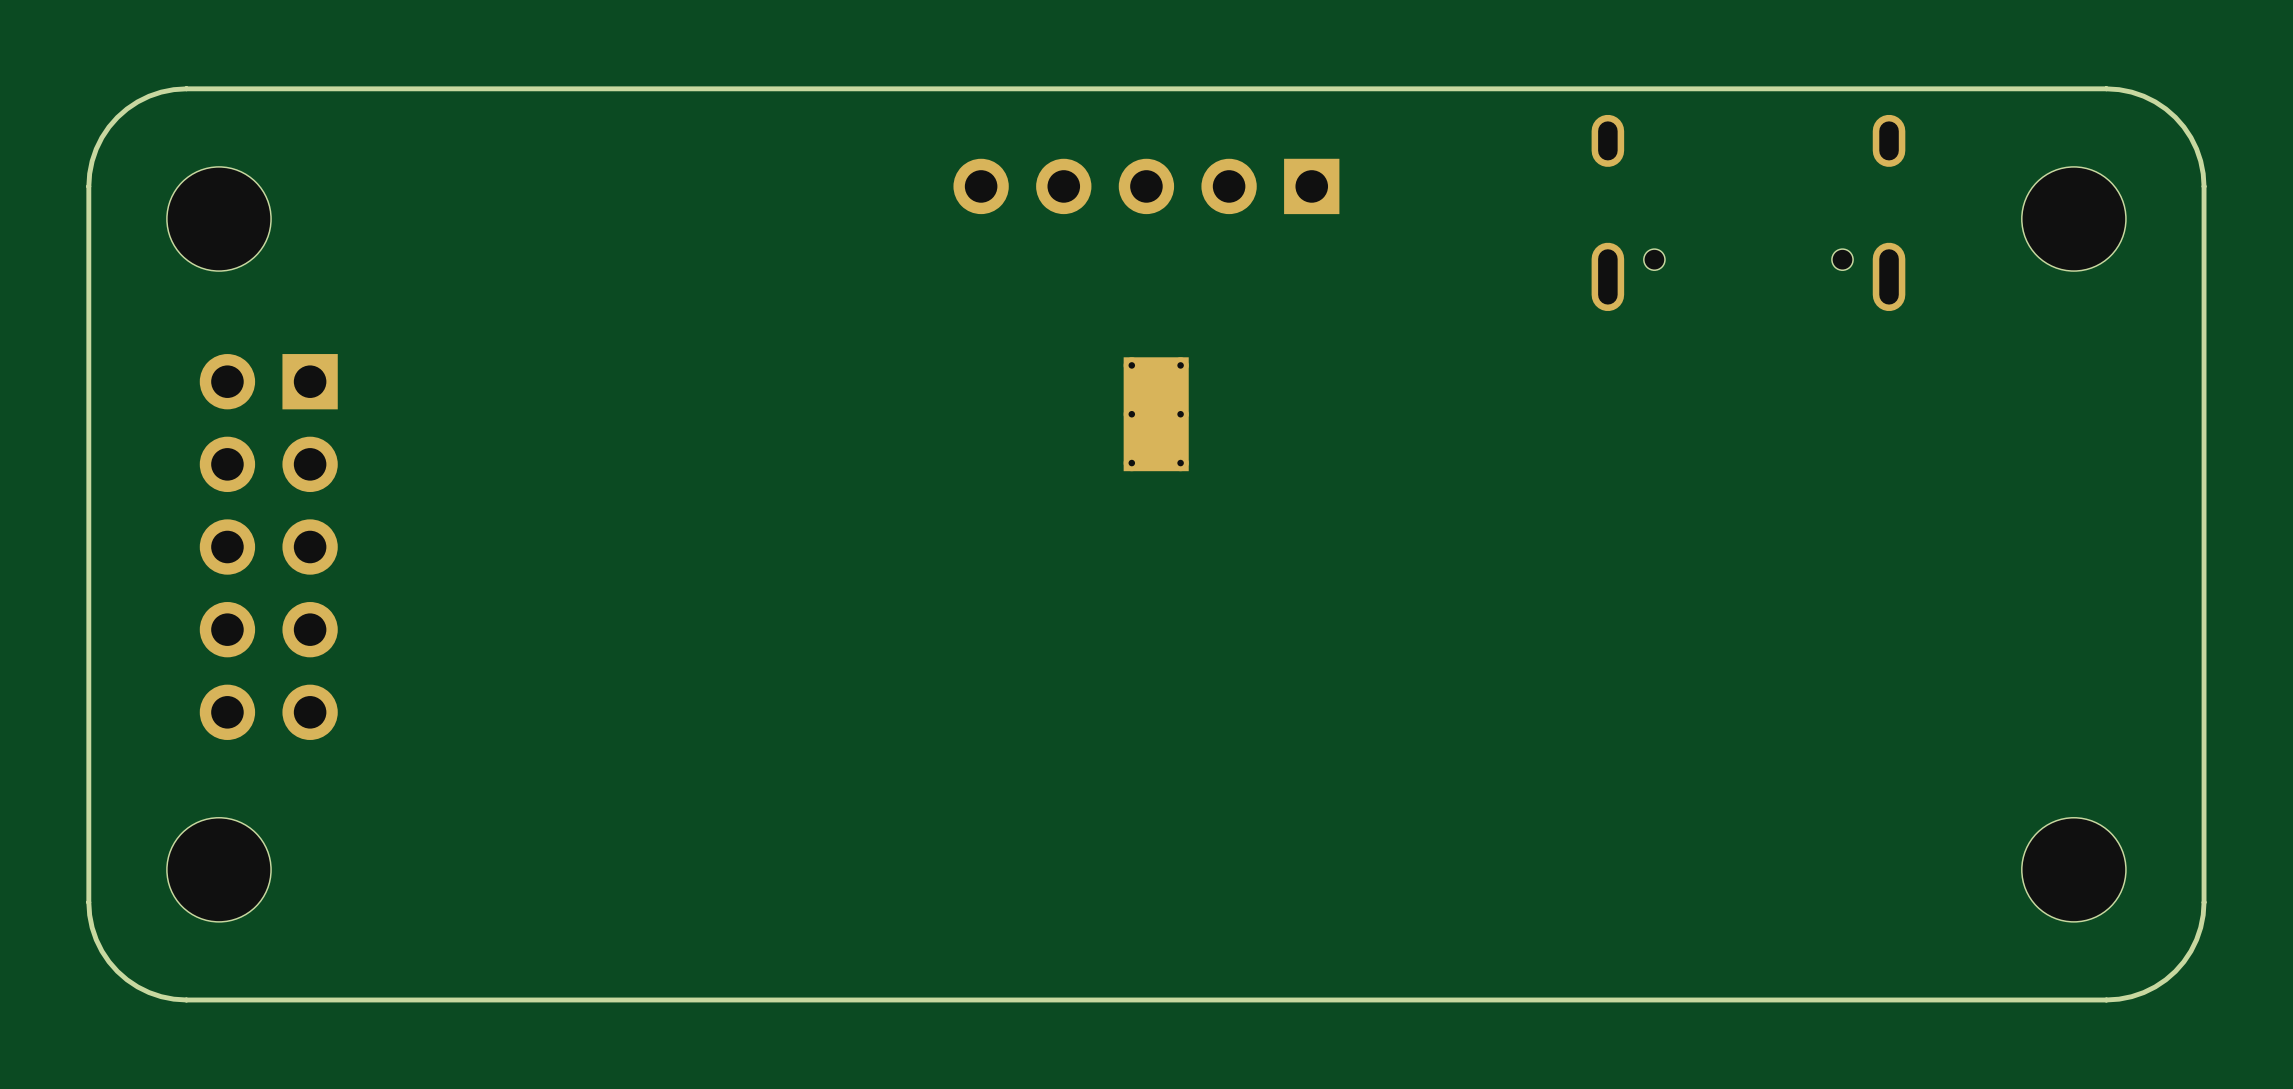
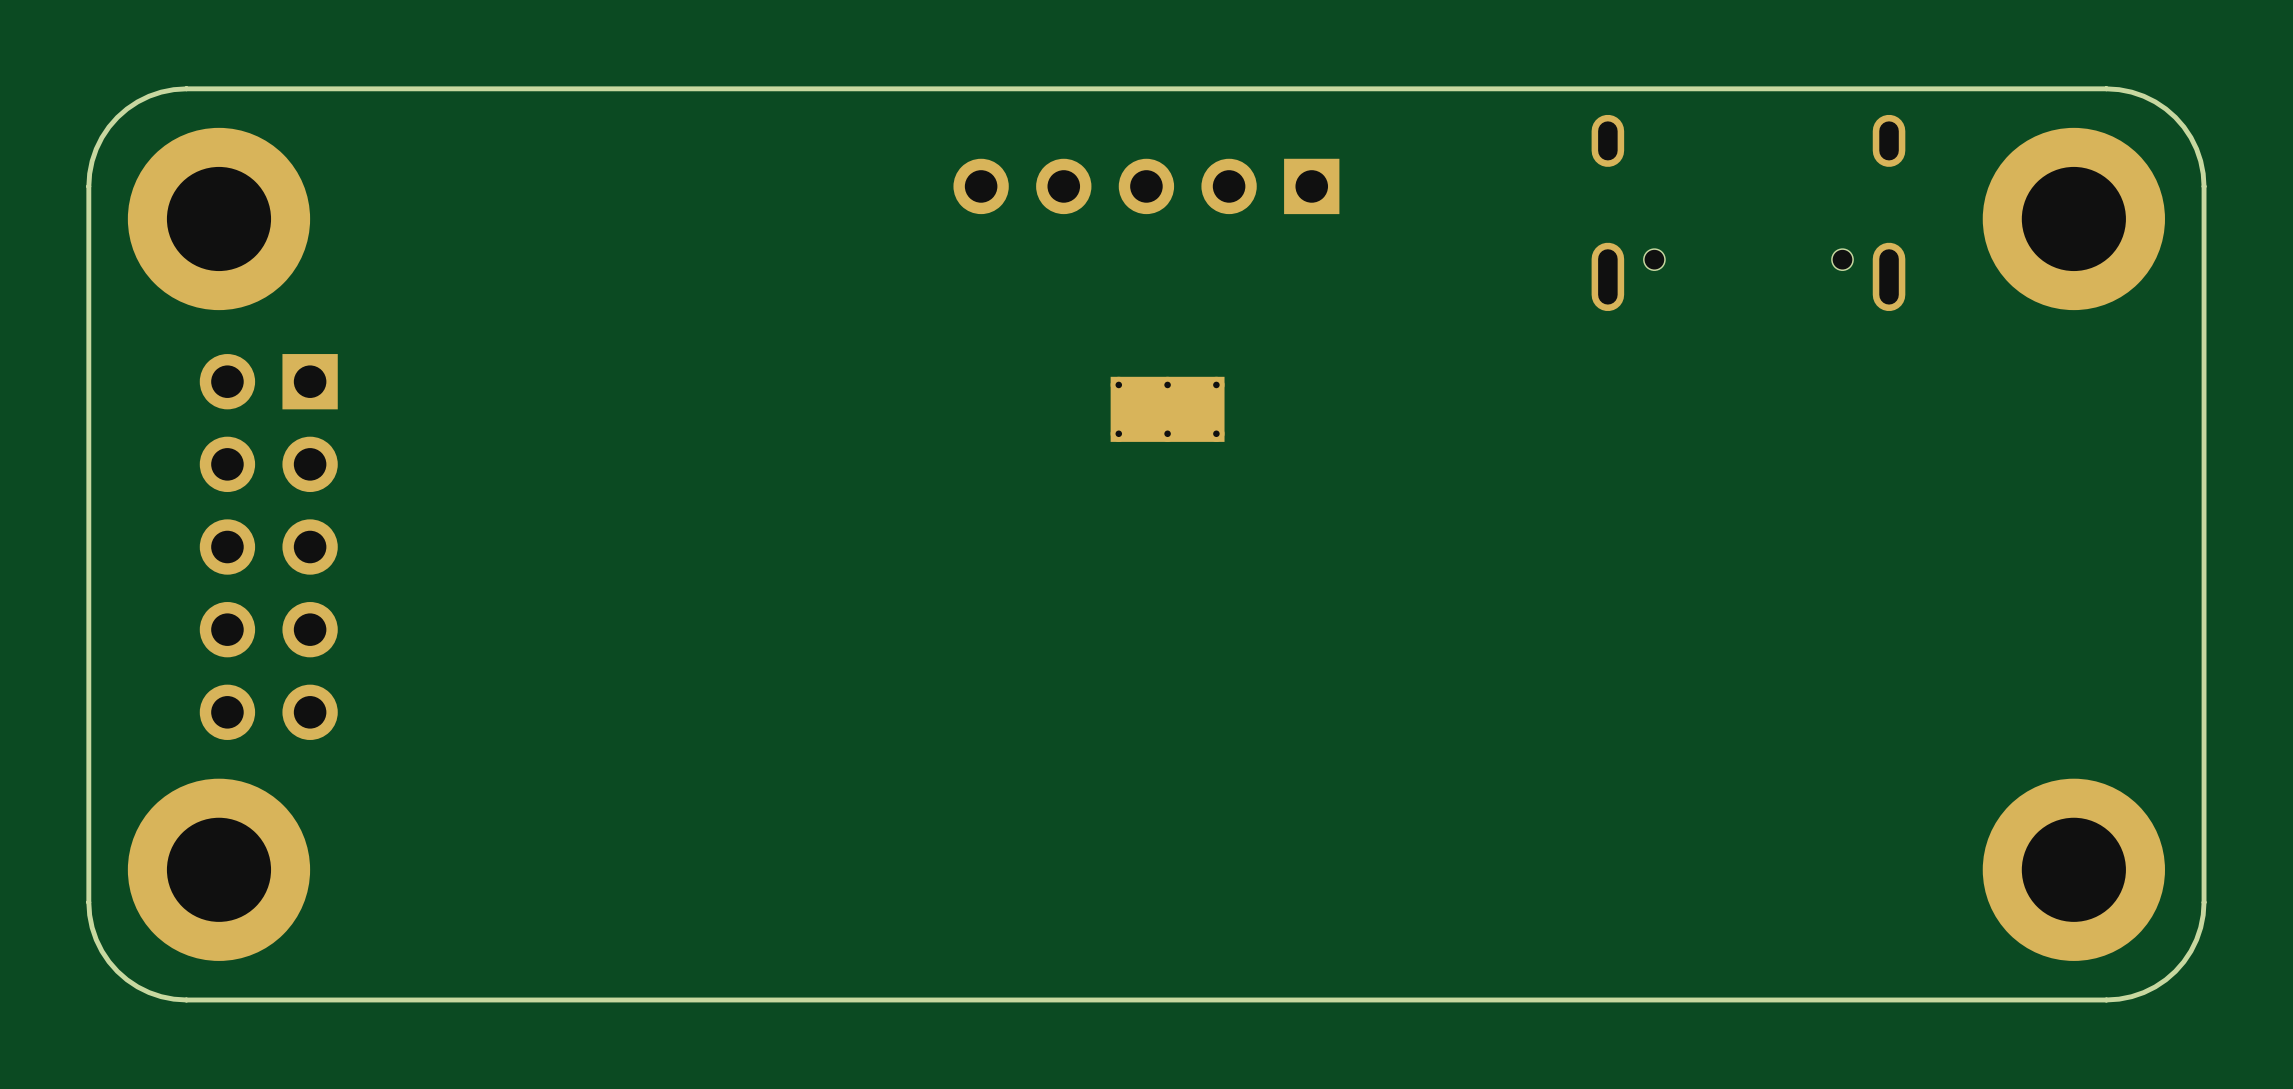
part footprint: [166, 166, 272, 272] -> [127, 127, 311, 311]
part footprint: [2021, 166, 2126, 272] -> [1982, 127, 2165, 311]
part rotation: 0° (1156, 414) -> 90° clockwise (1167, 409)
part footprint: [166, 817, 272, 922] -> [127, 778, 311, 961]
part footprint: [2021, 817, 2126, 922] -> [1982, 778, 2165, 961]

